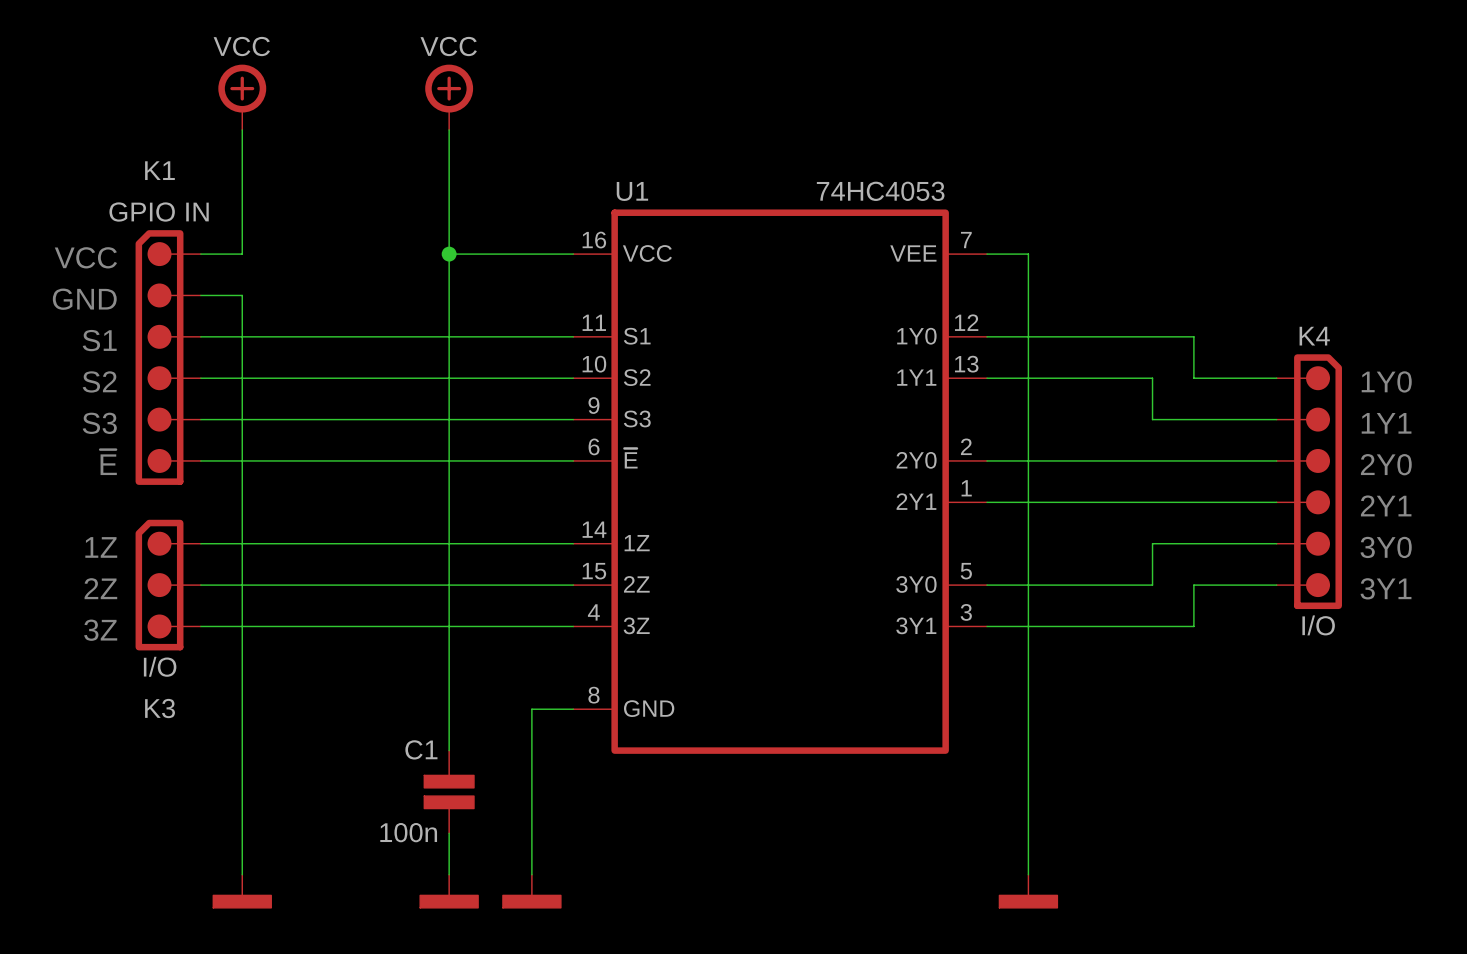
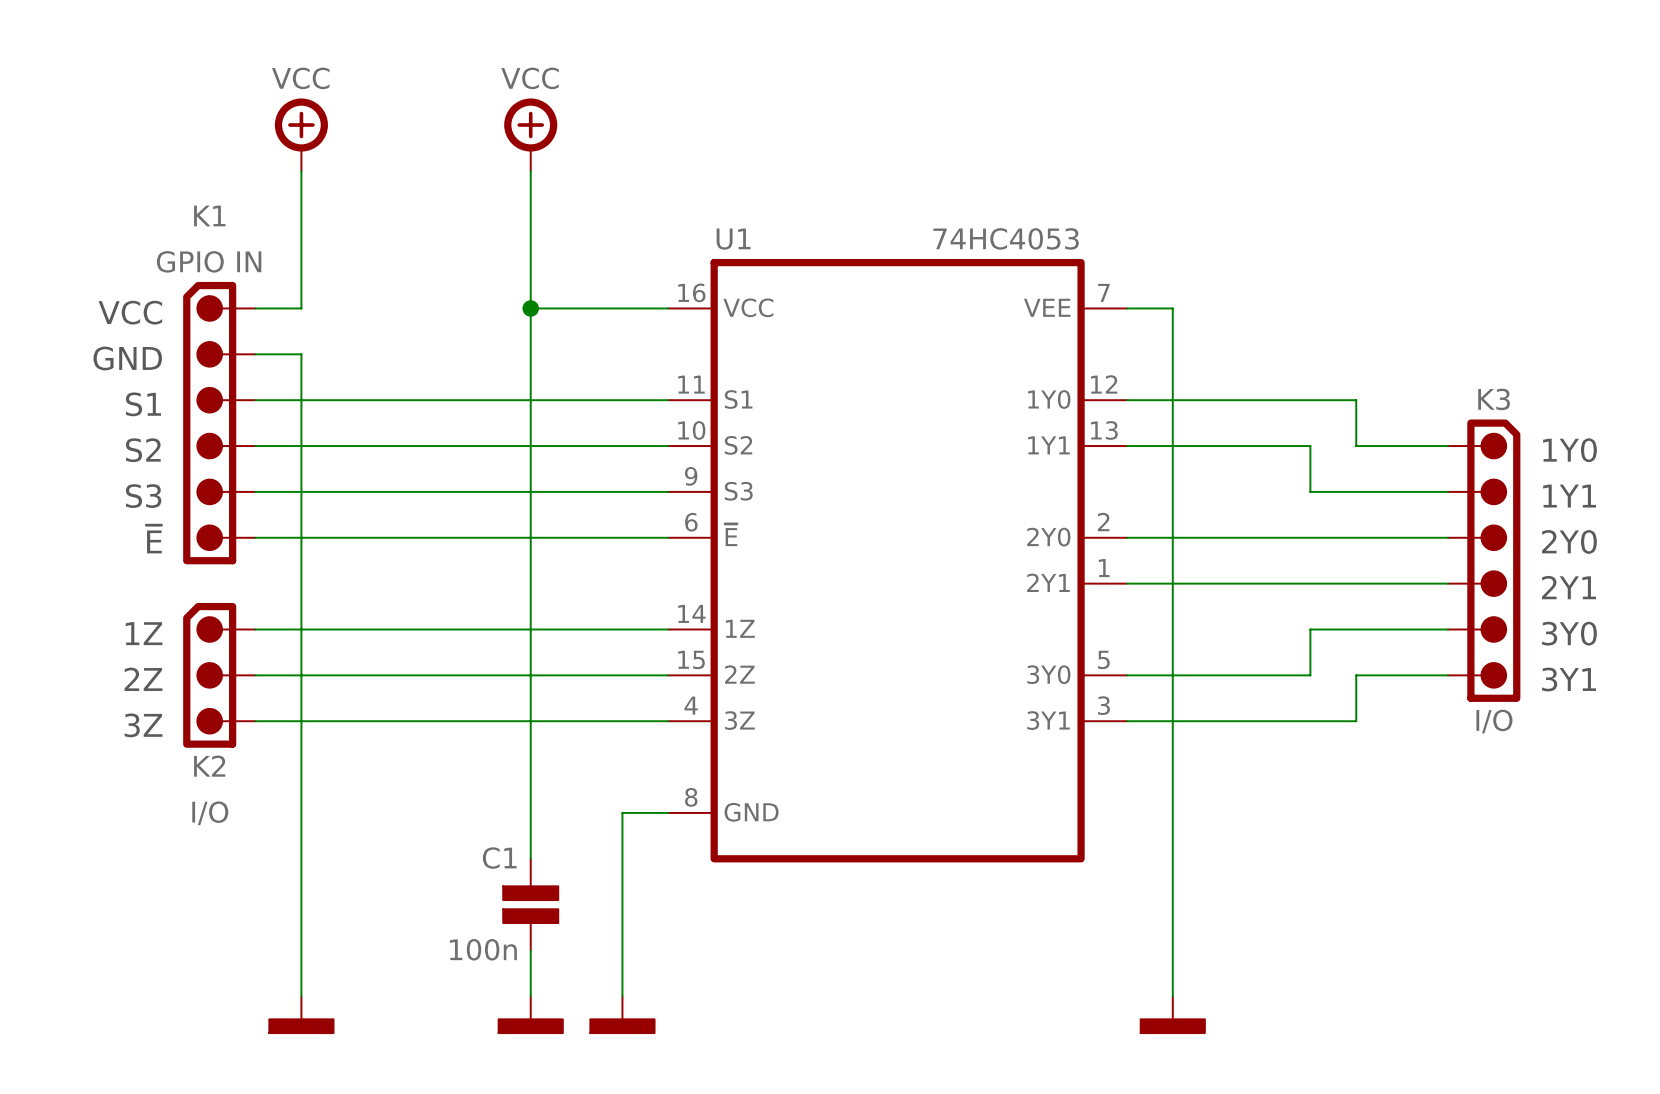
K4 name: K4 (1314, 336) -> K3 (1494, 399)
K3 value position: I/O (160, 666) -> I/O (210, 813)
K3 name: K3 (160, 708) -> K2 (209, 766)

